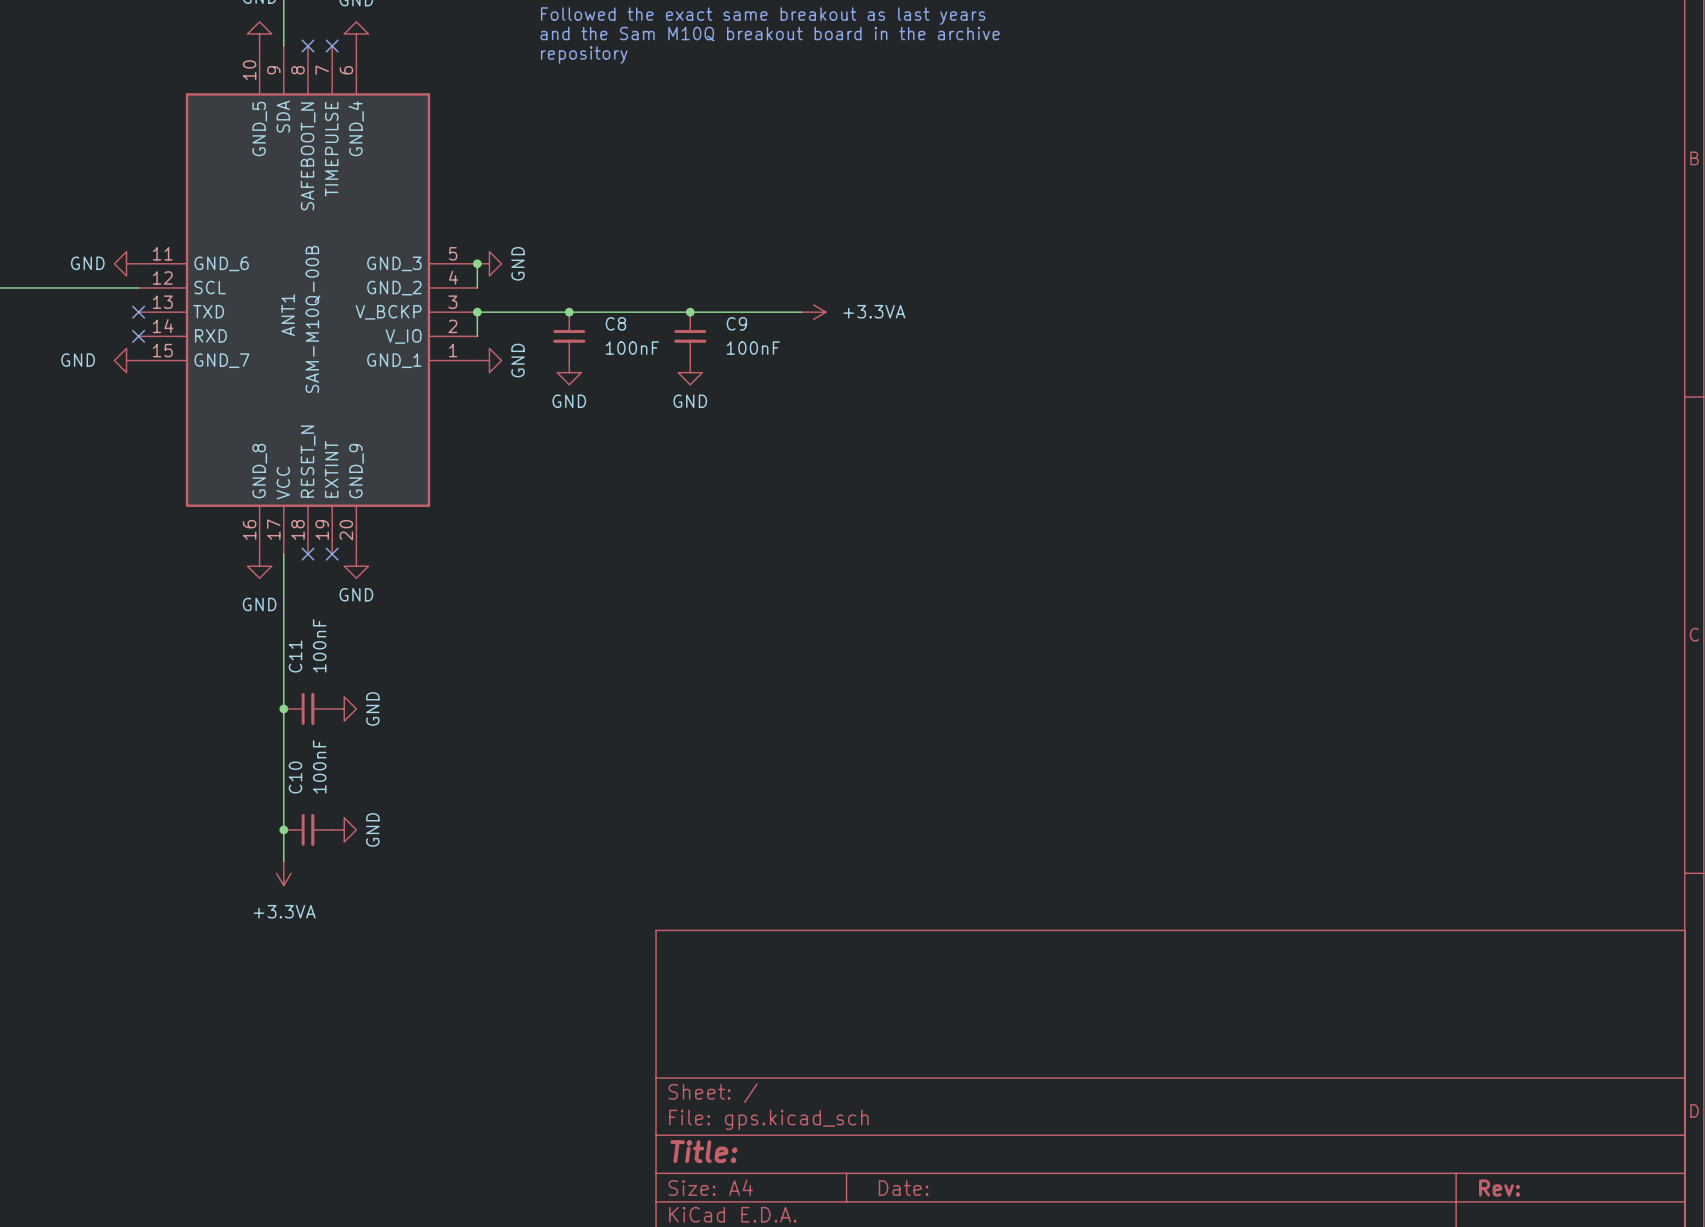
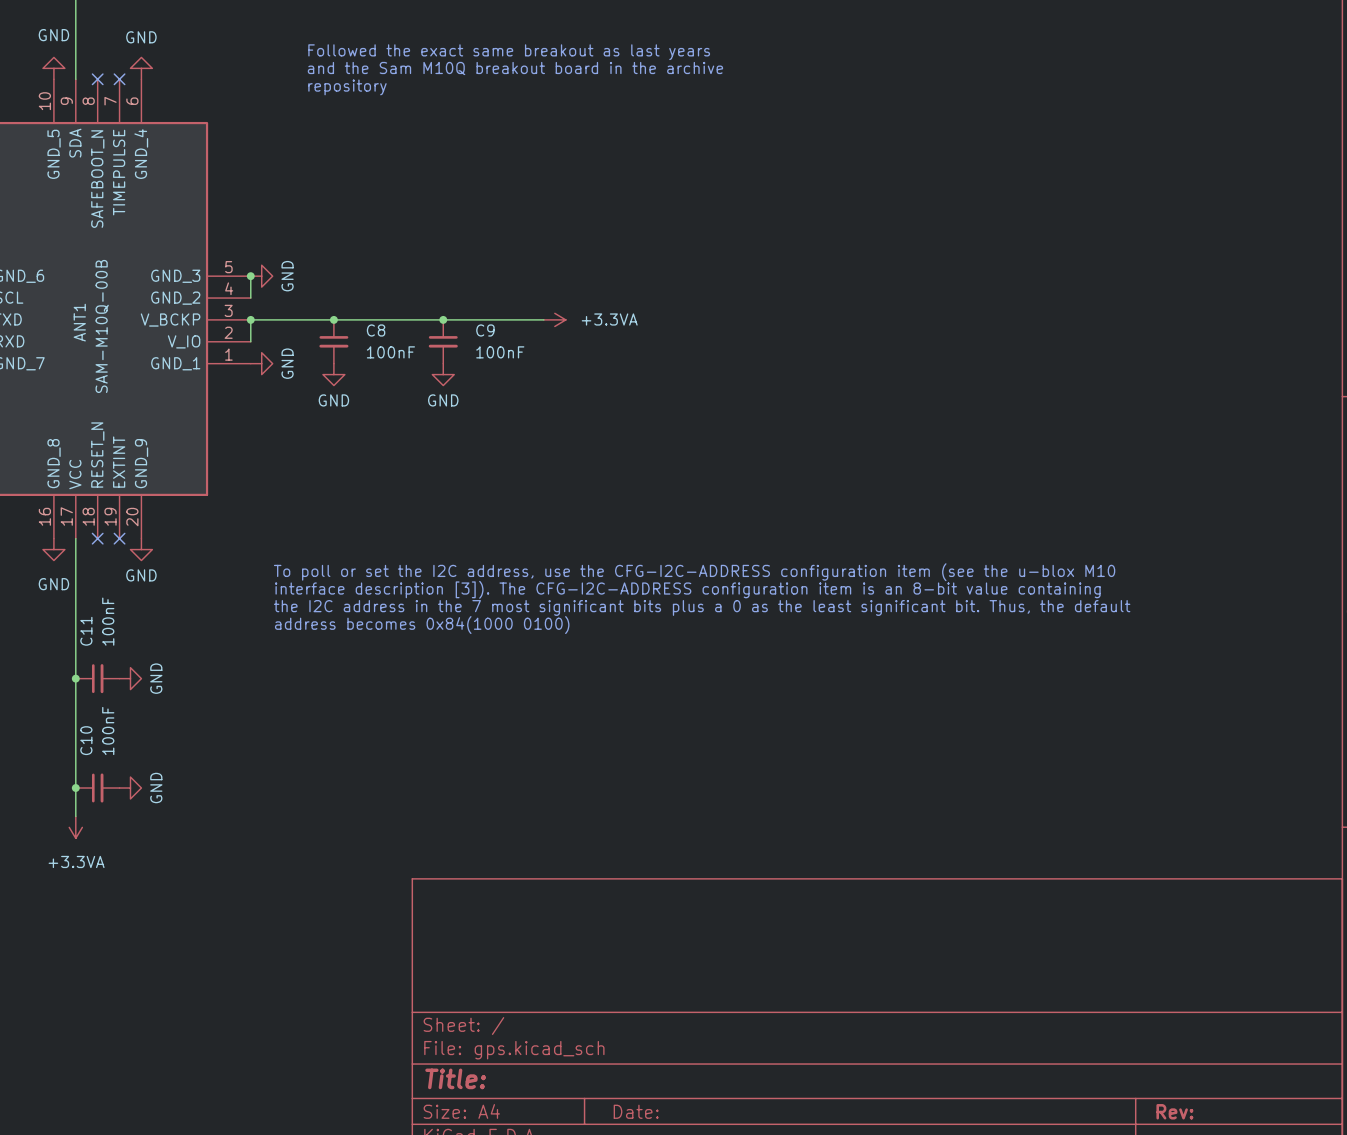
text: none -> To poll or set the I2C address, use the CFG-I2C-ADDRESS configuration item (see the u-blox M10 (694, 572)
text: none -> interface description [3]). The CFG-I2C-ADDRESS configuration item is an 8-bit value containing (687, 589)
text: none -> the I2C address in the 7 most significant bits plus a 0 as the least significant bit. Thus, the default (702, 607)
text: none -> address becomes 0x84(1000 0100) (422, 625)

